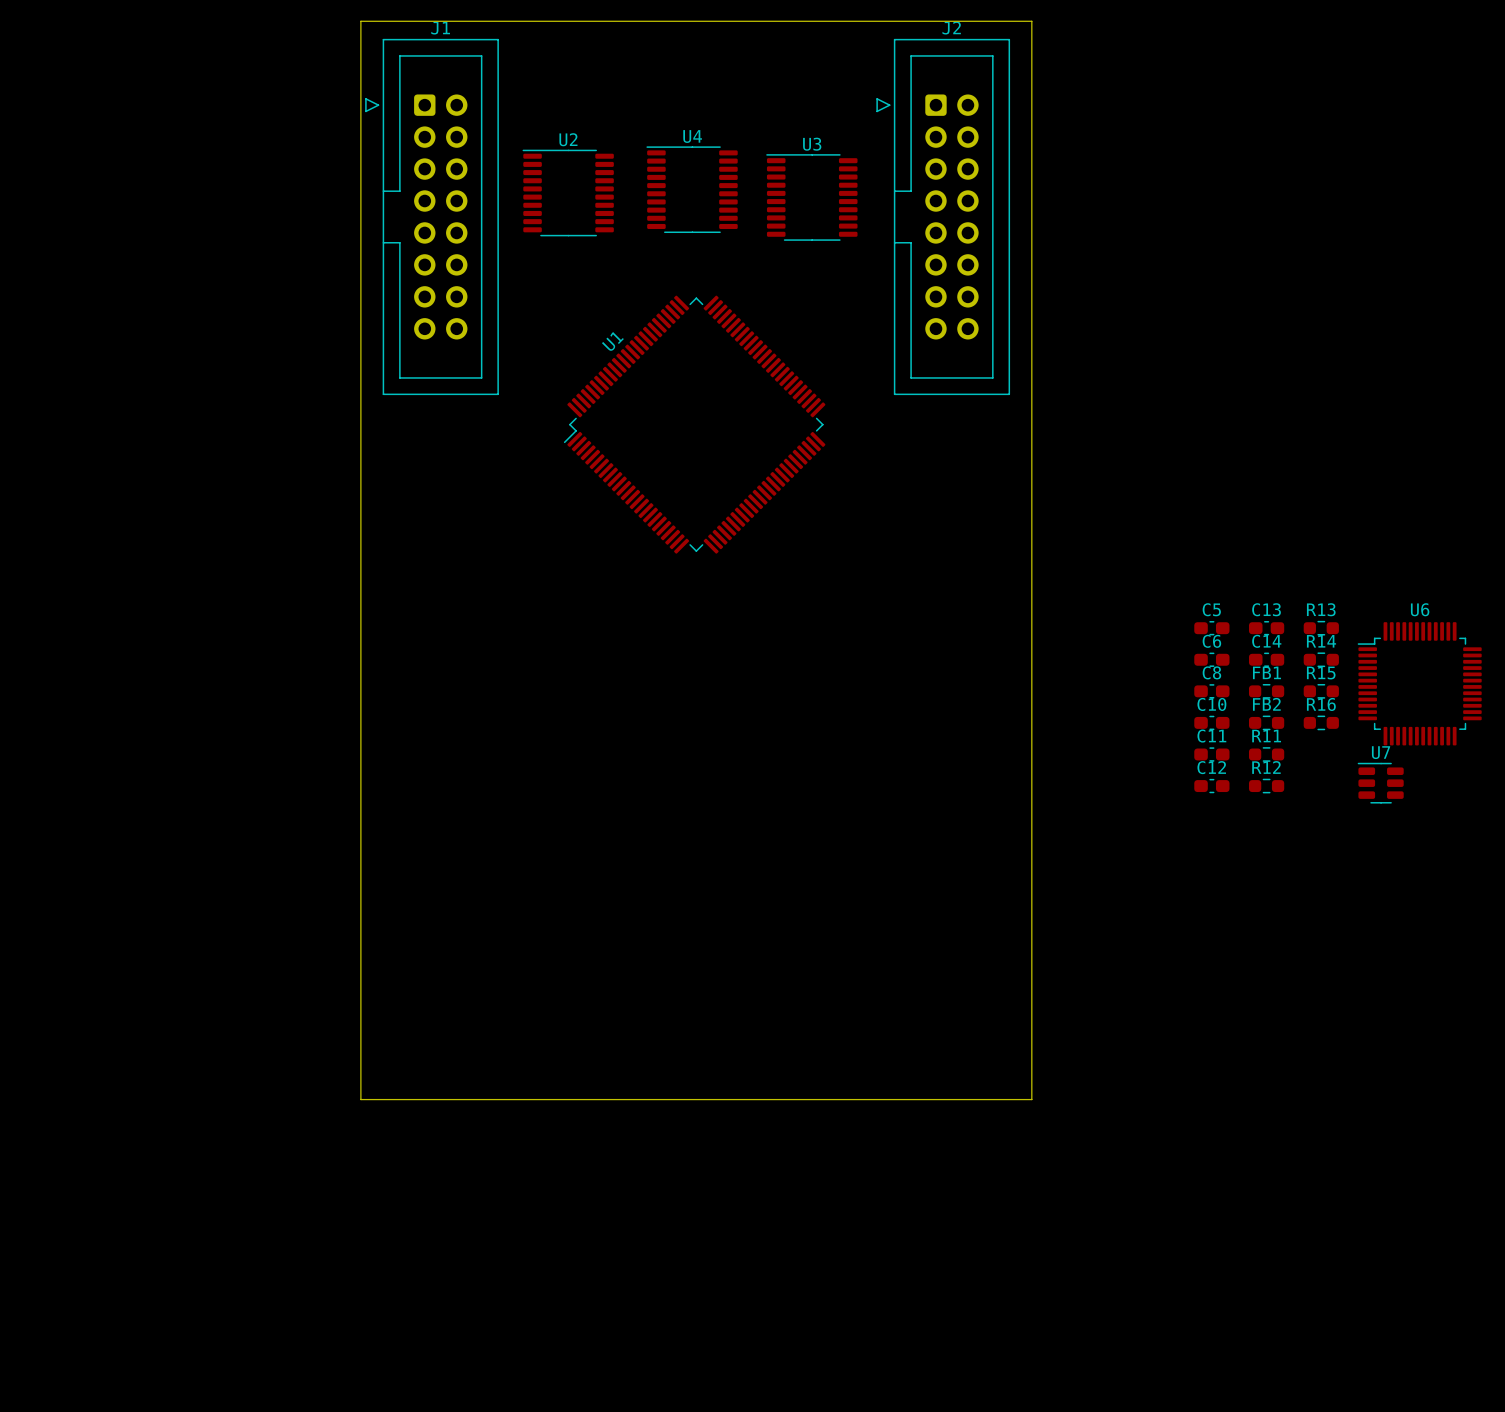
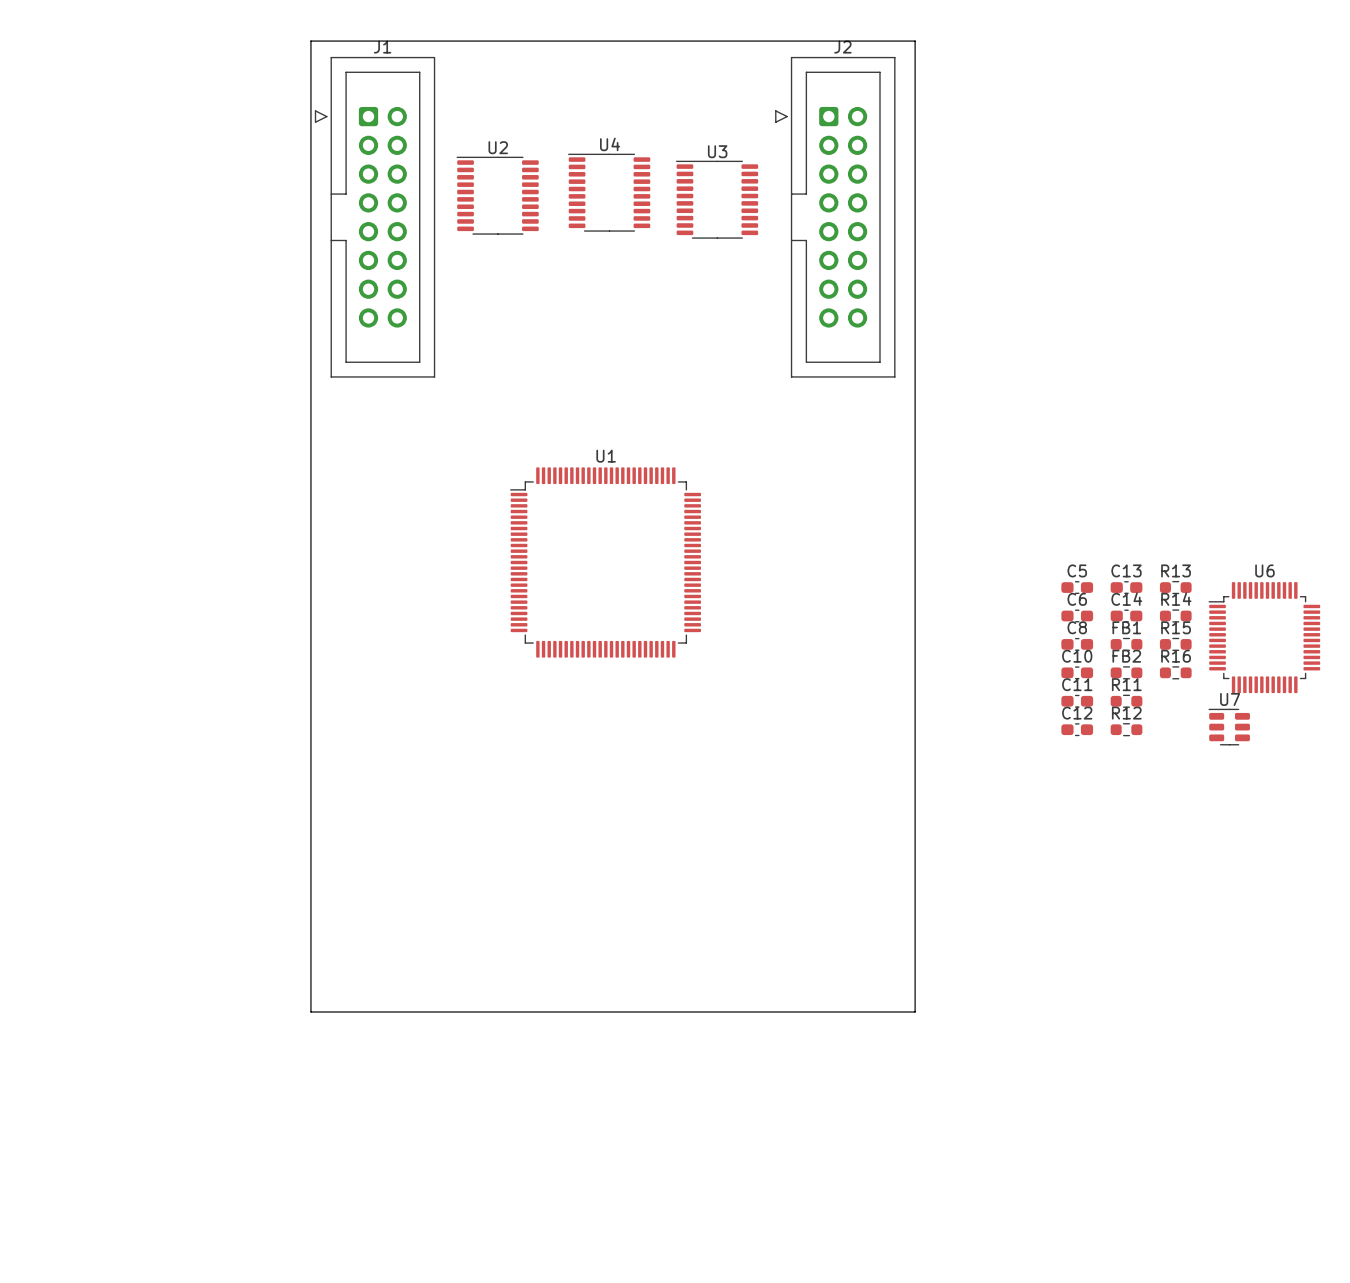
U1 rotation: 0° (694, 424) -> 45° clockwise (605, 562)
U1 position: (694, 424) -> (605, 562)

